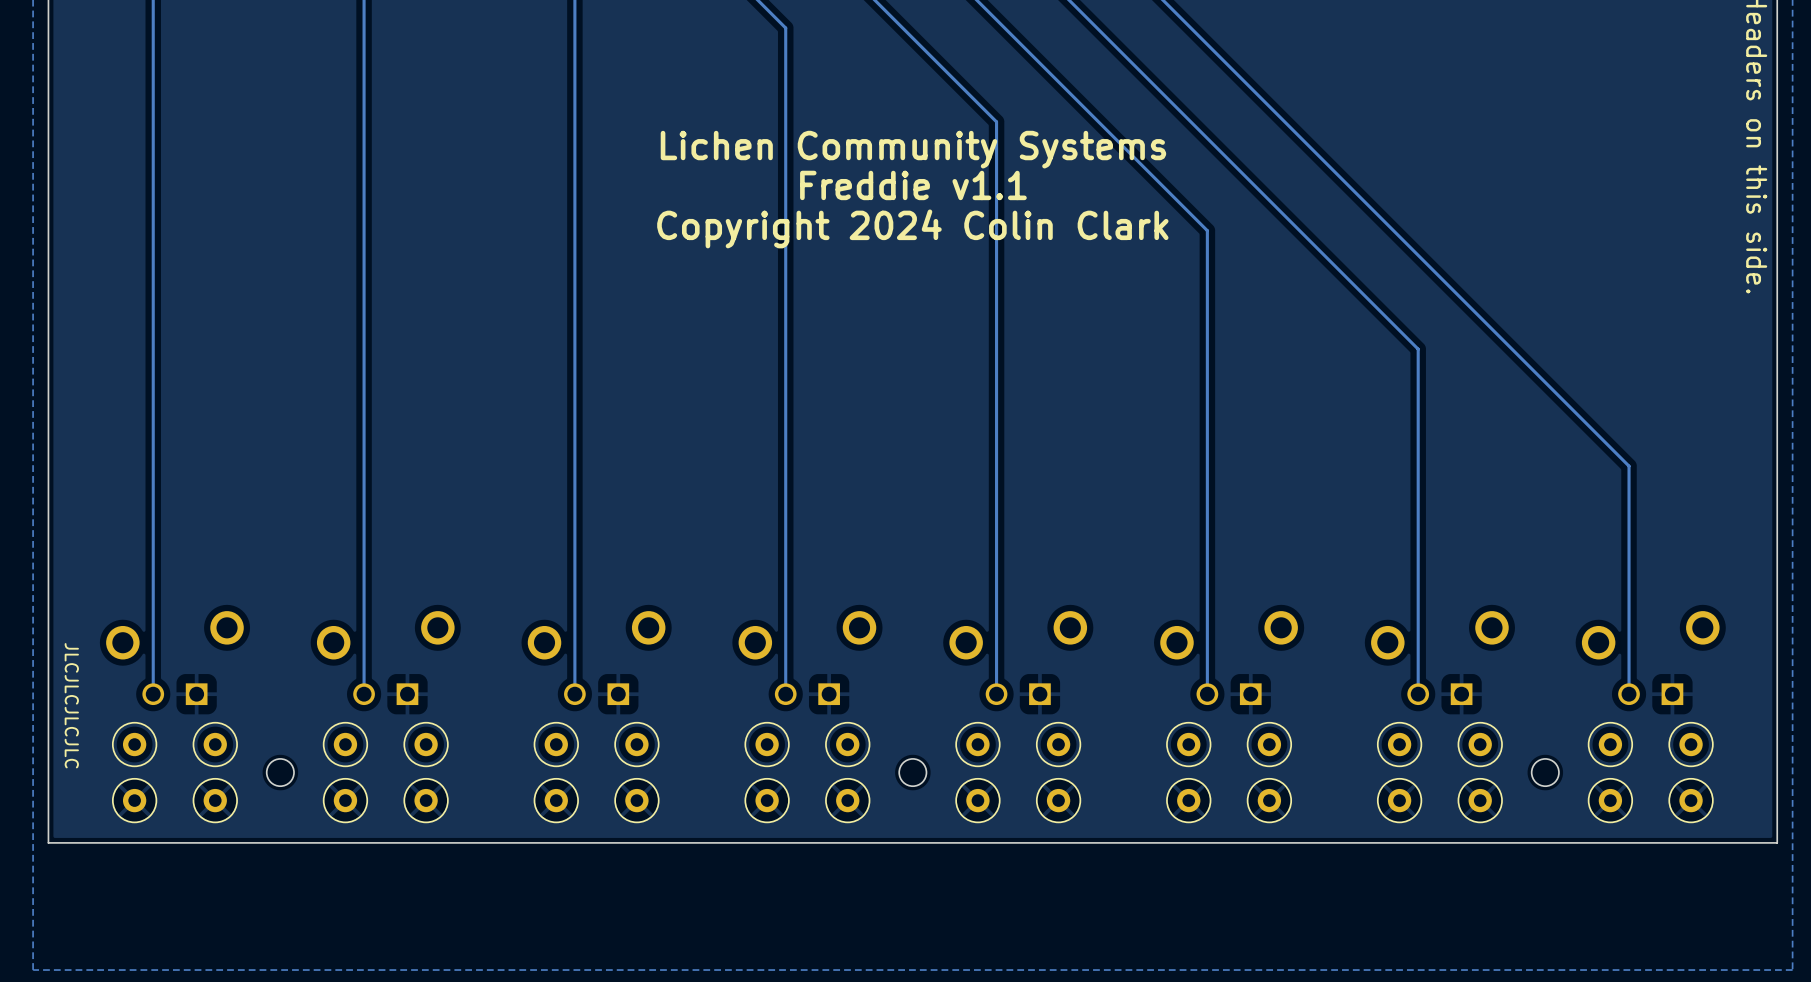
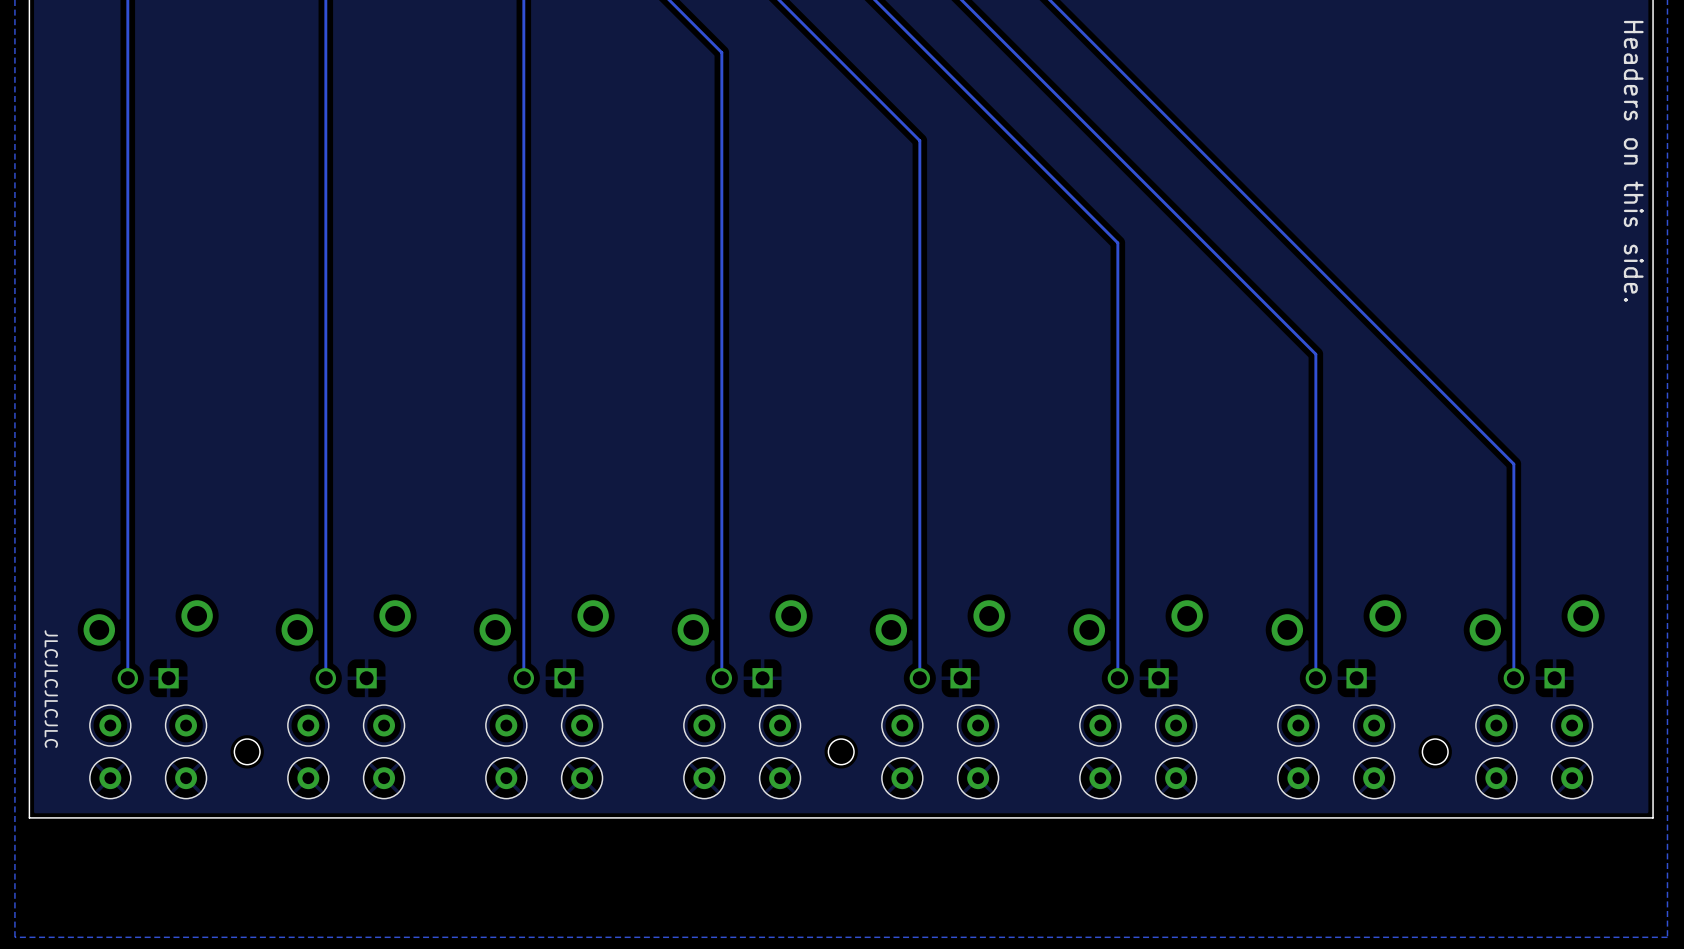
text: Lichen Community Systems (913, 149) -> none
text: Freddie v1.1 (913, 185) -> none
text: Copyright 2024 Colin Clark (912, 228) -> none

